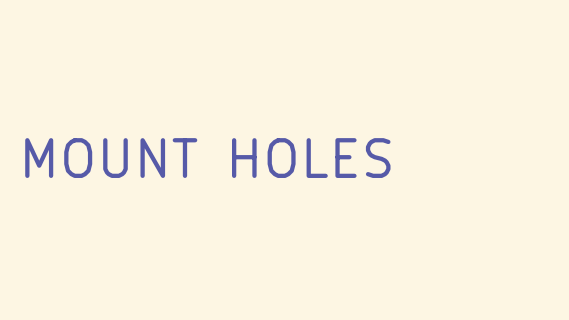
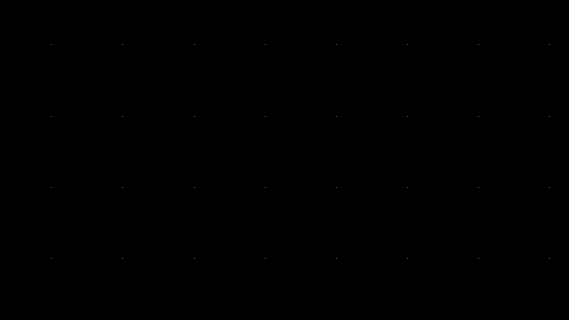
text: MOUNT HOLES (207, 158) -> none

